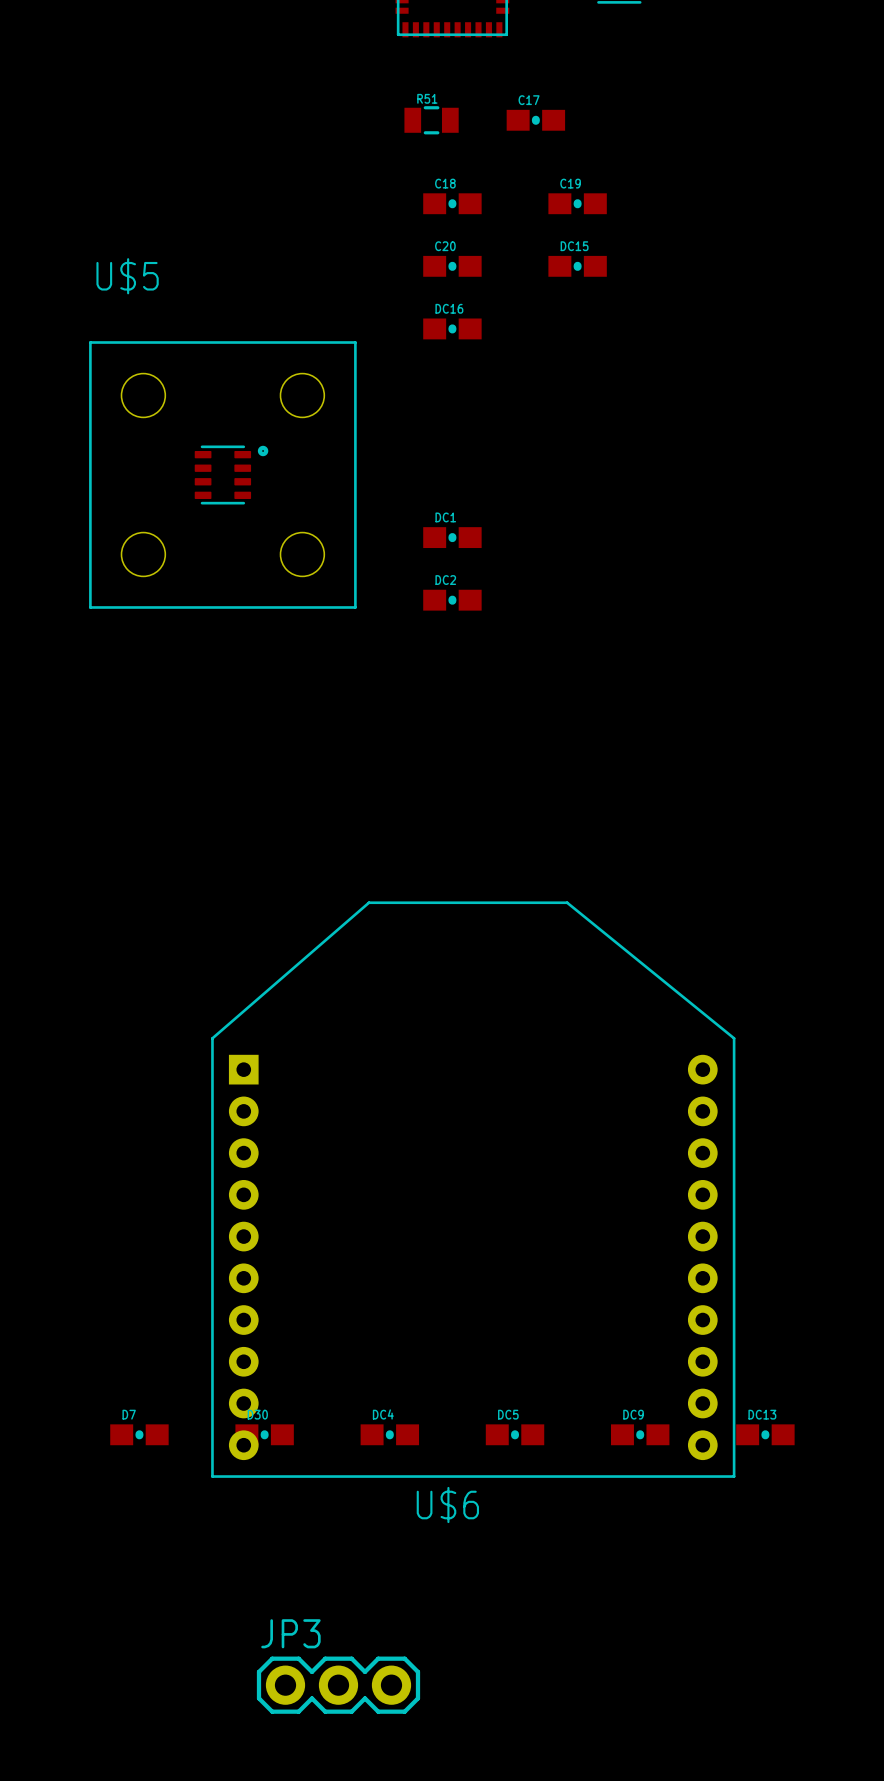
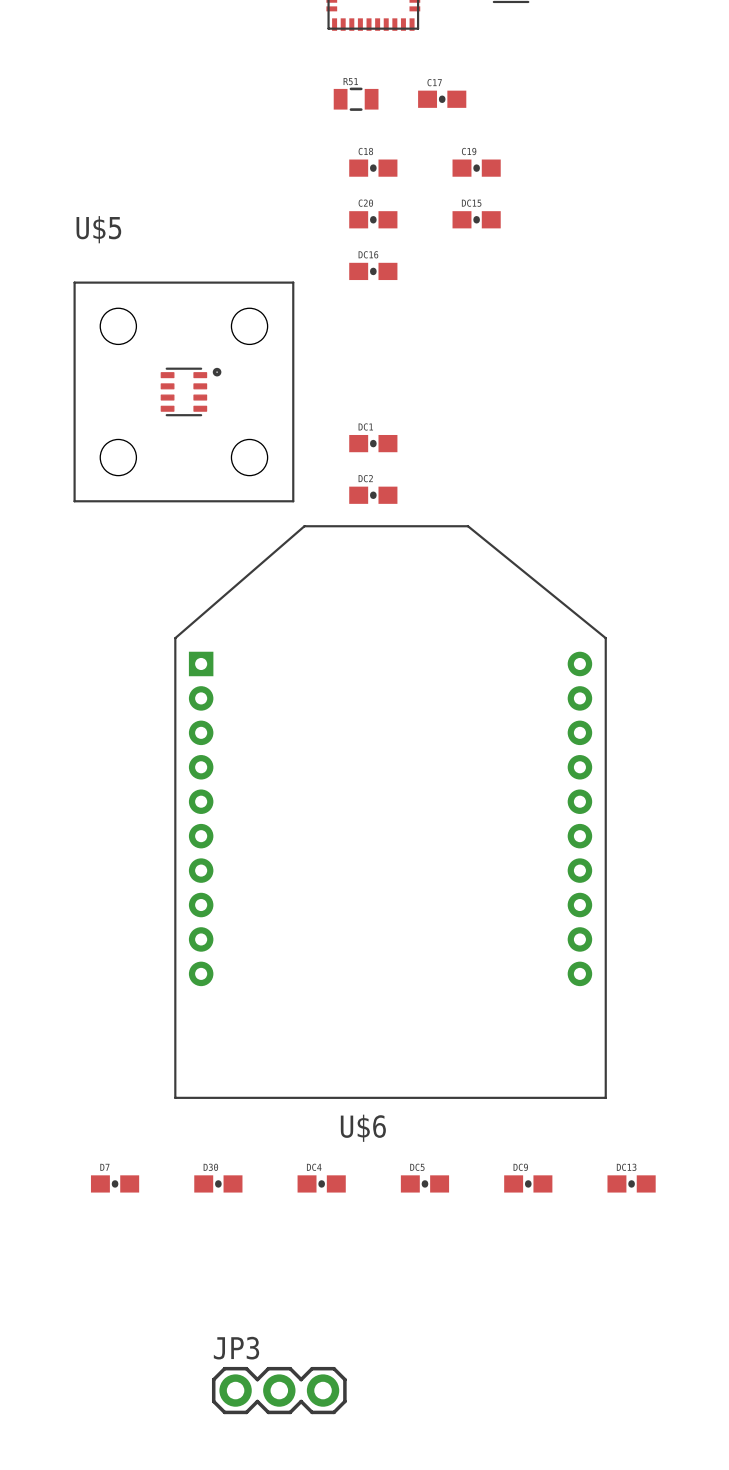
U$6 footprint: [211, 901, 736, 1478] -> [174, 525, 607, 1099]
U$6 name position: U$6 (447, 1505) -> U$6 (363, 1128)

